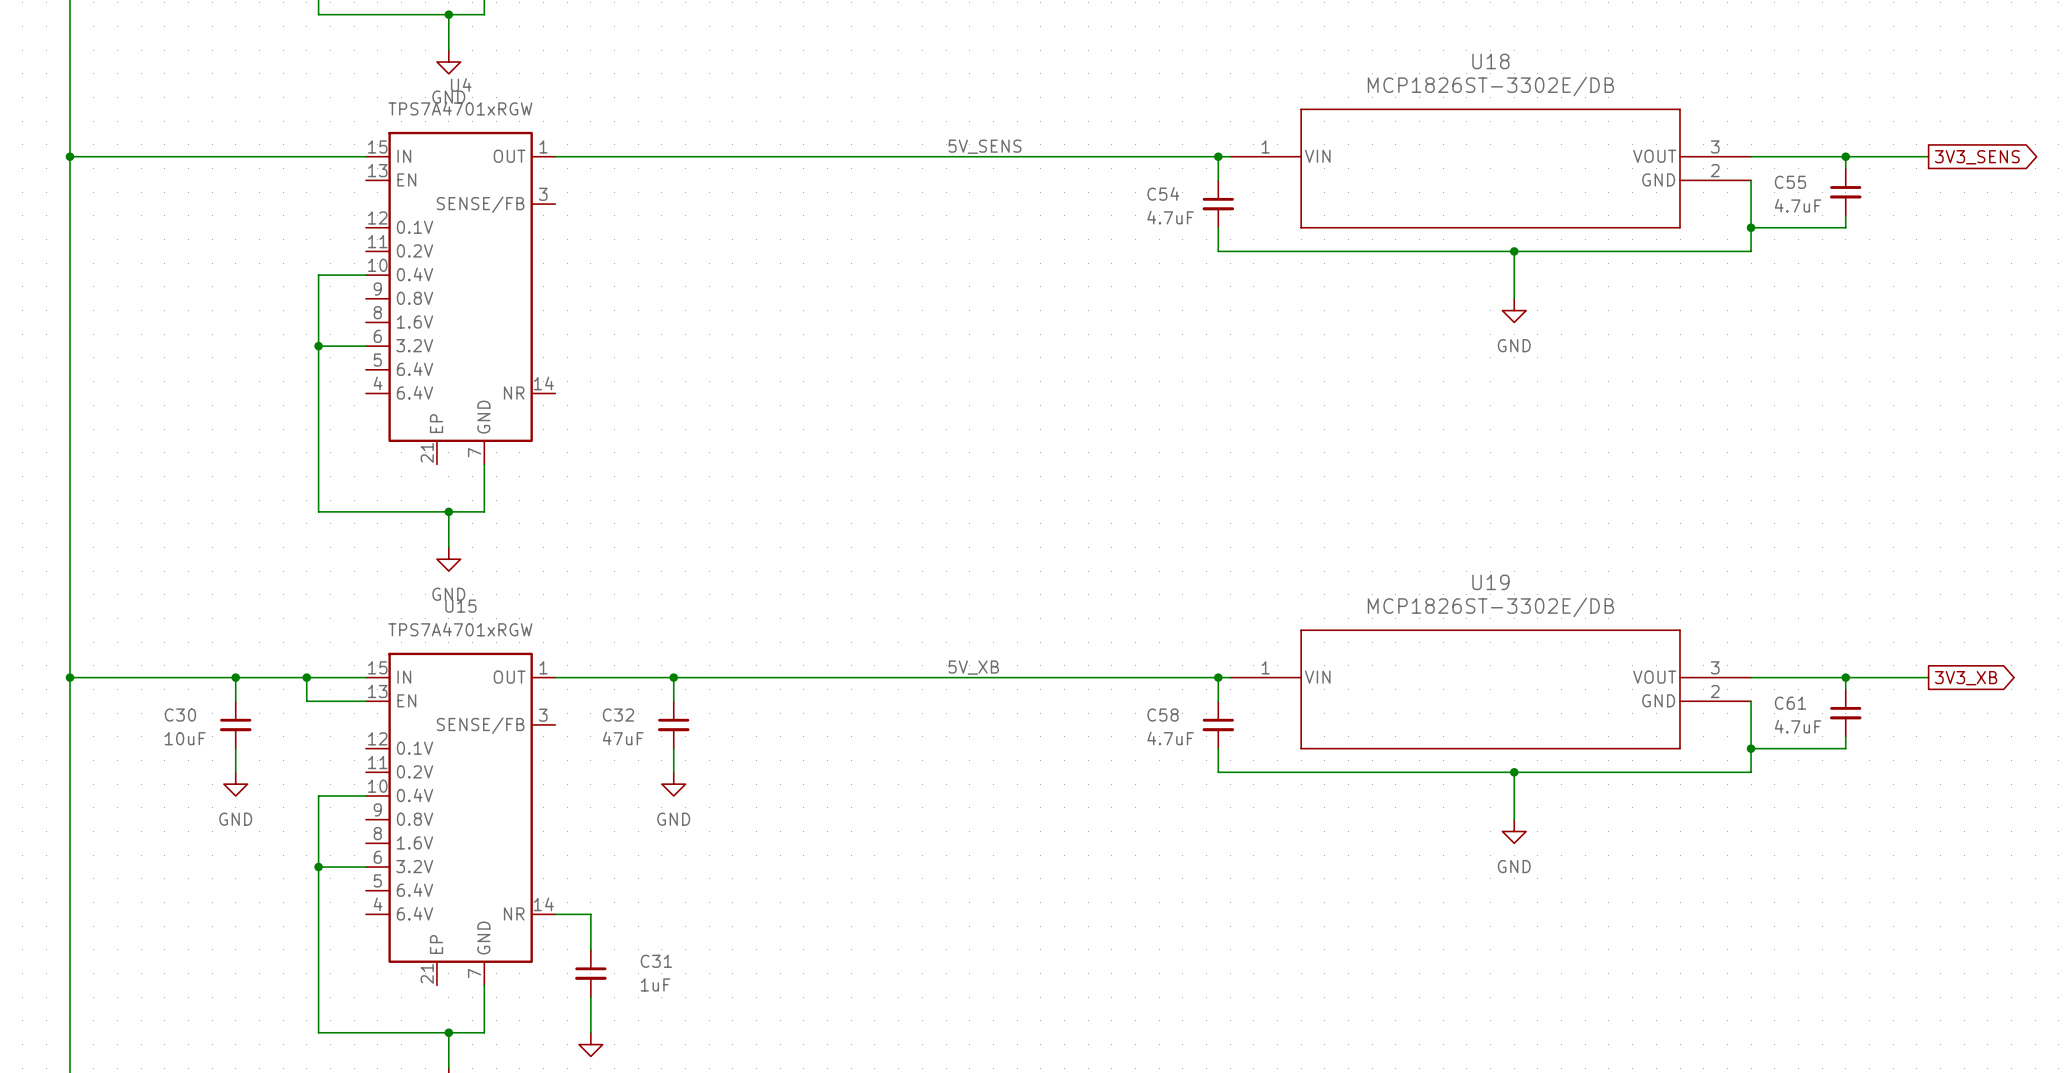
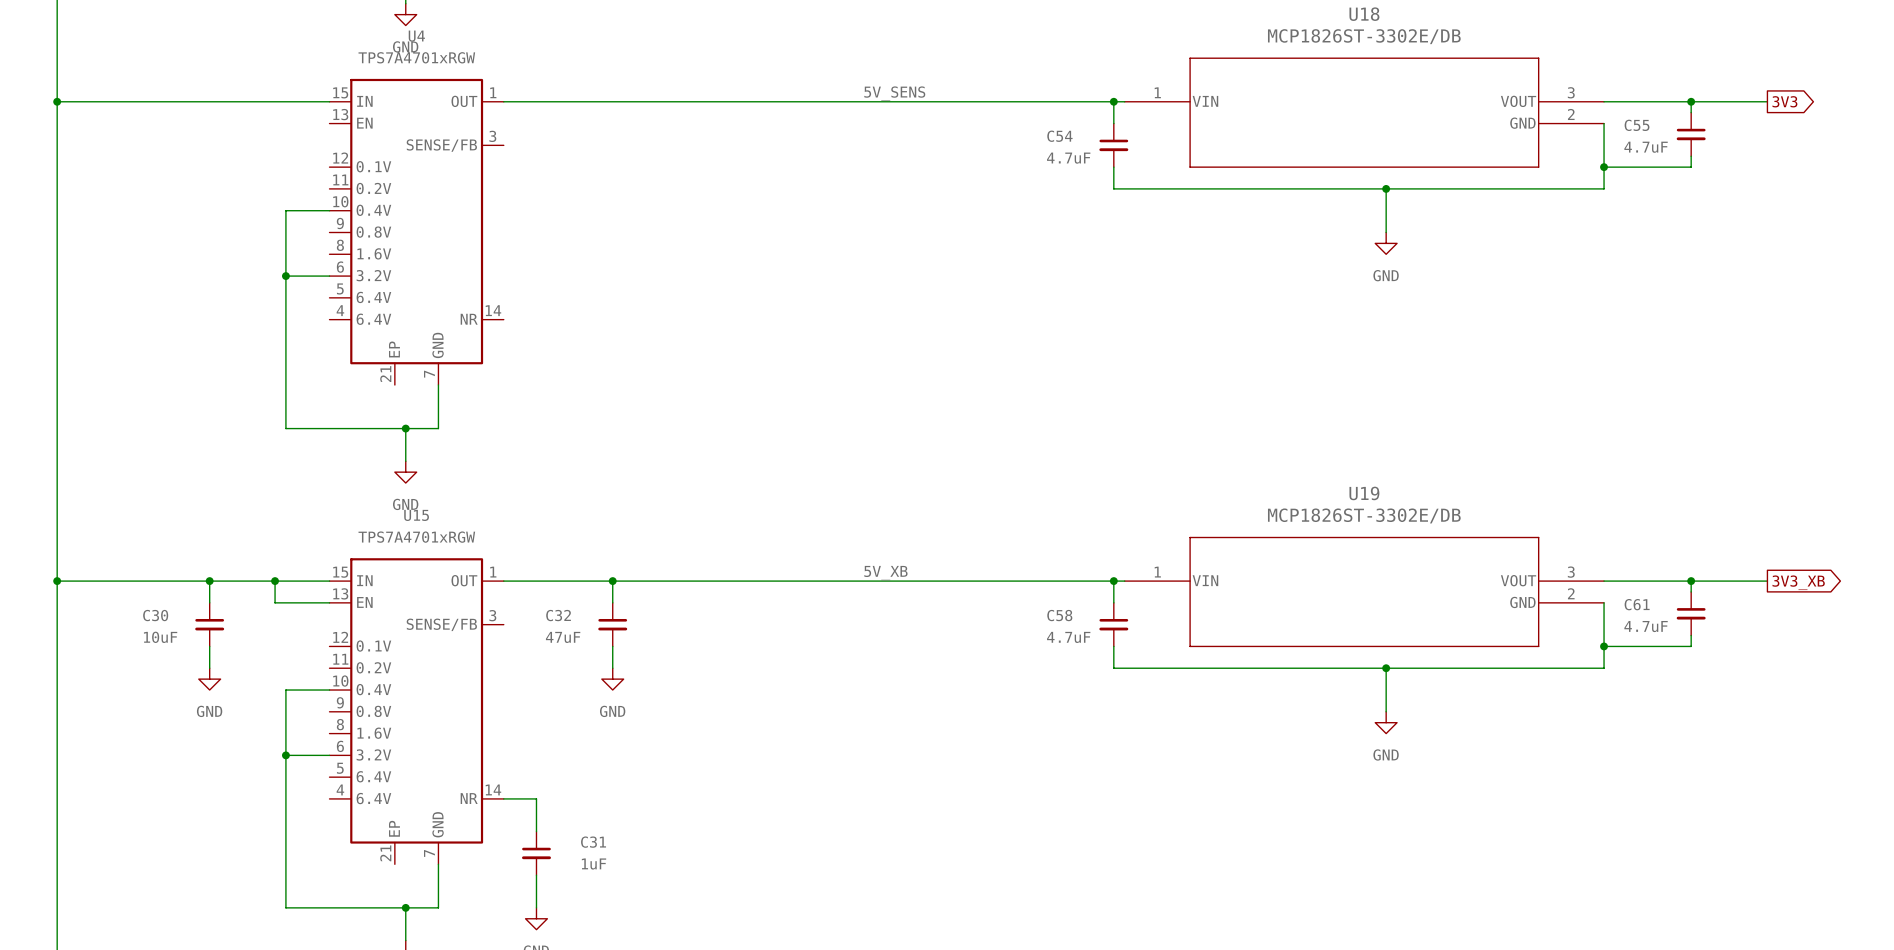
global label: 3V3_SENS (1977, 157) -> 3V3 (1784, 101)

